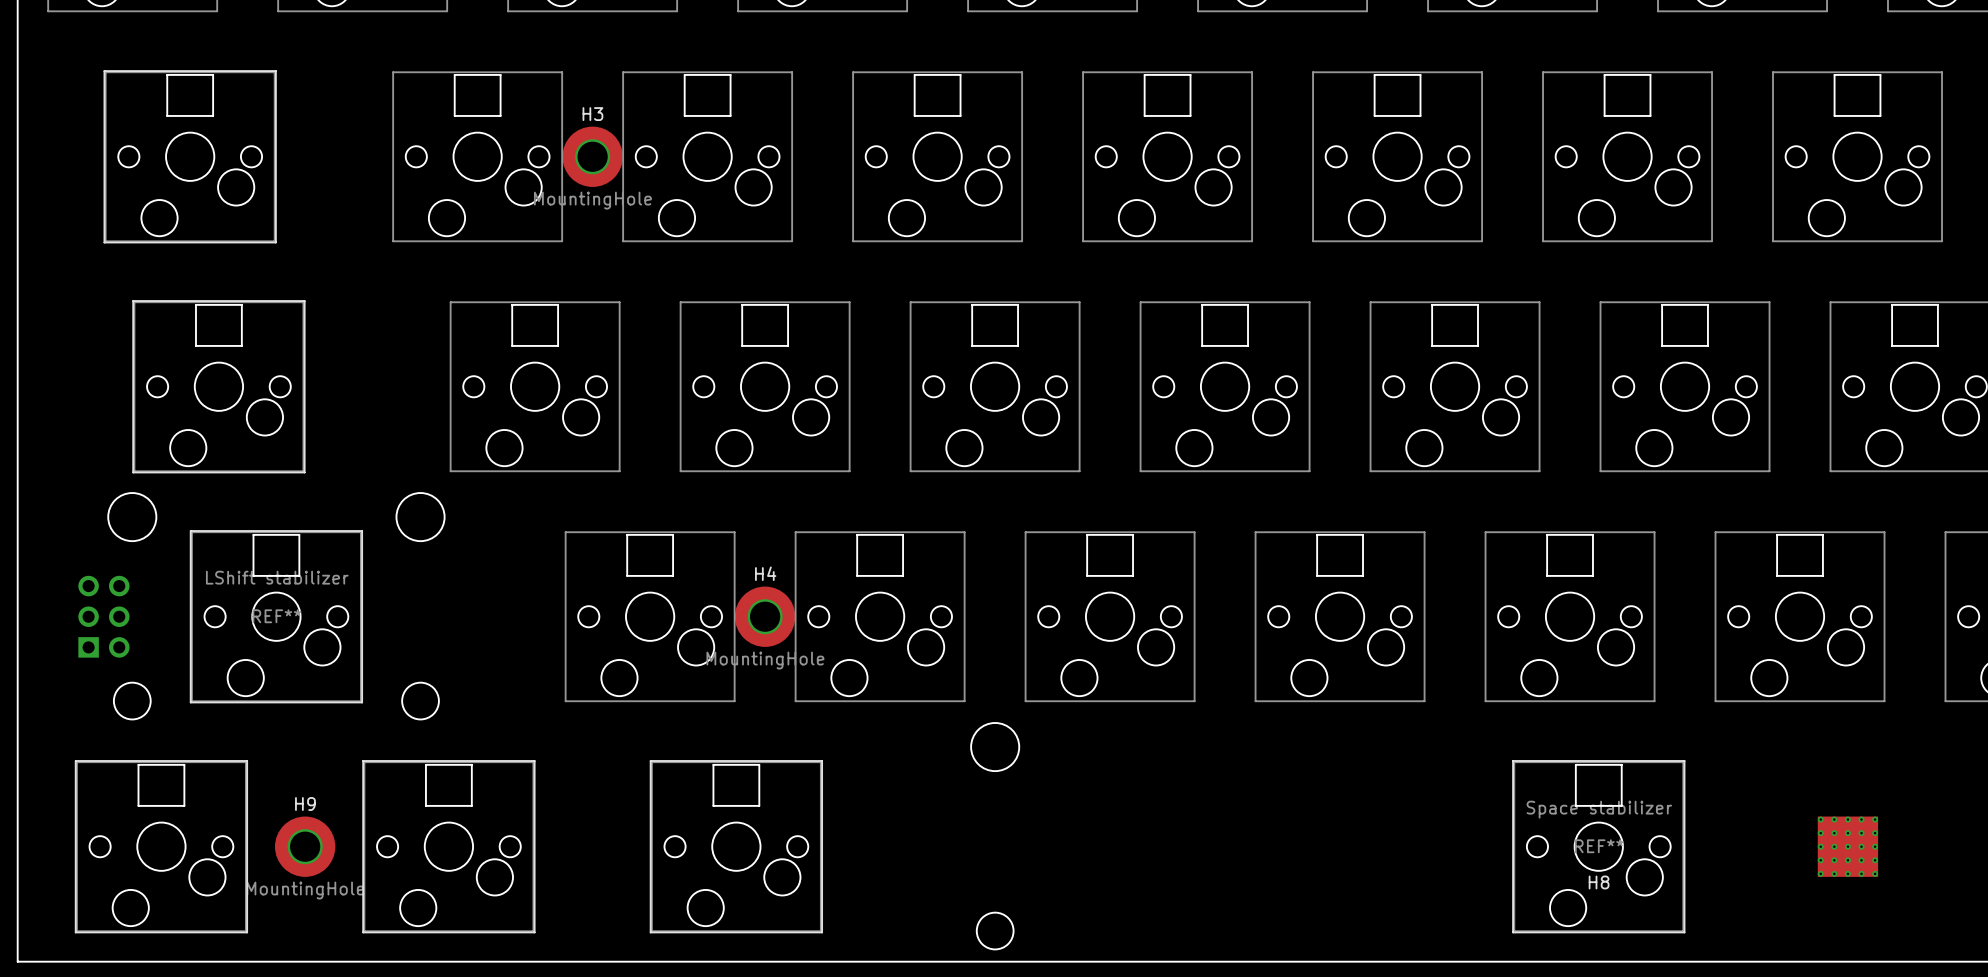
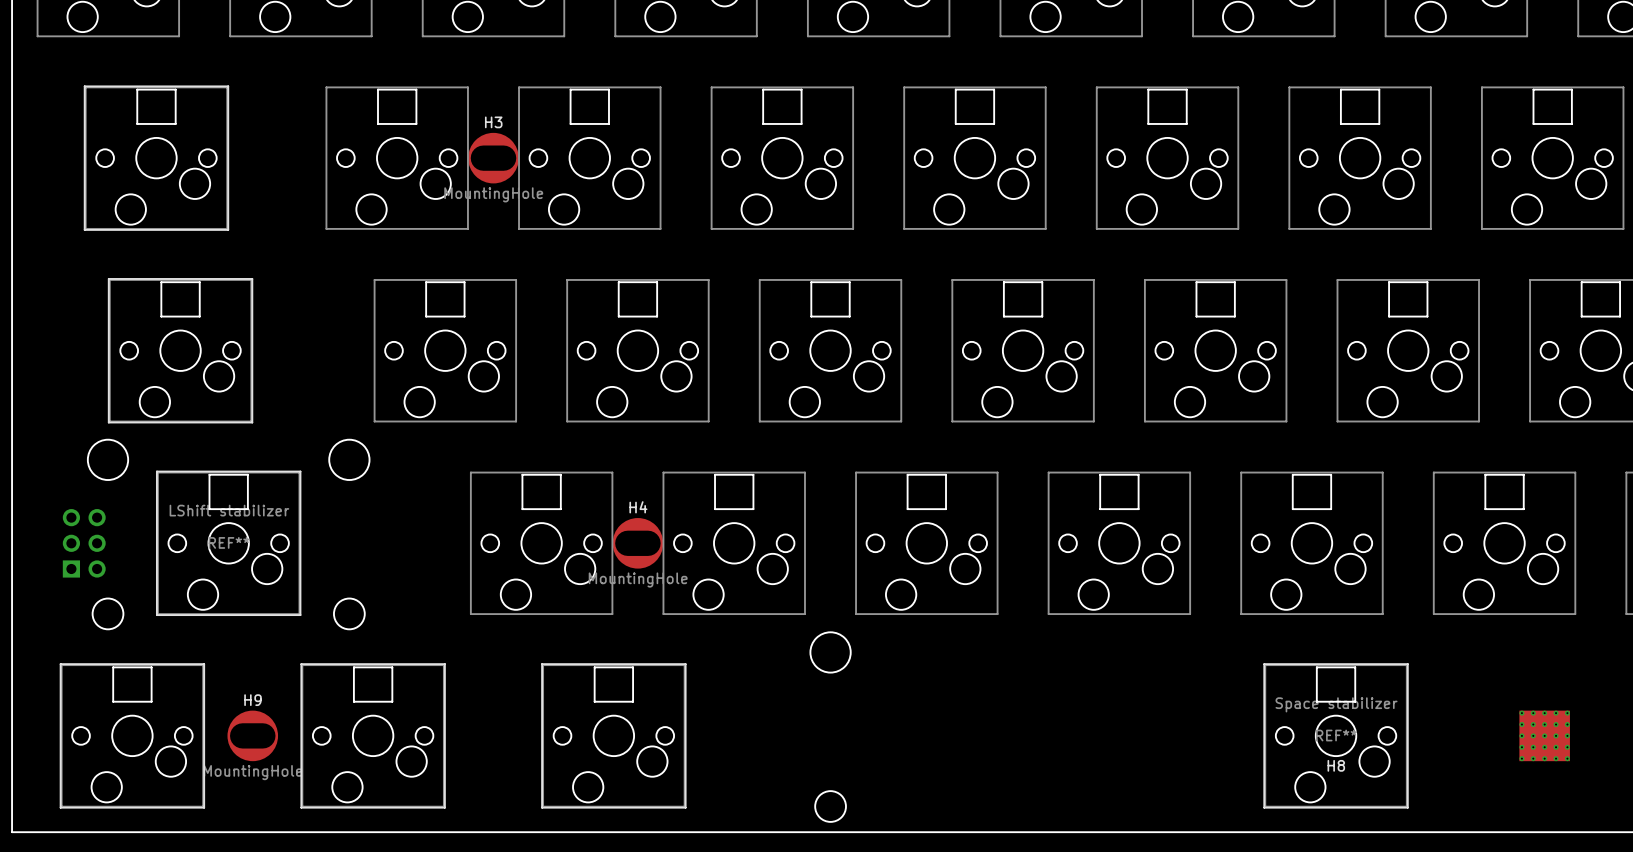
H3 footprint: [562, 126, 623, 187] -> [468, 132, 519, 184]
H4 footprint: [734, 586, 796, 647] -> [612, 518, 664, 569]
H9 footprint: [274, 816, 336, 877] -> [227, 710, 279, 762]

